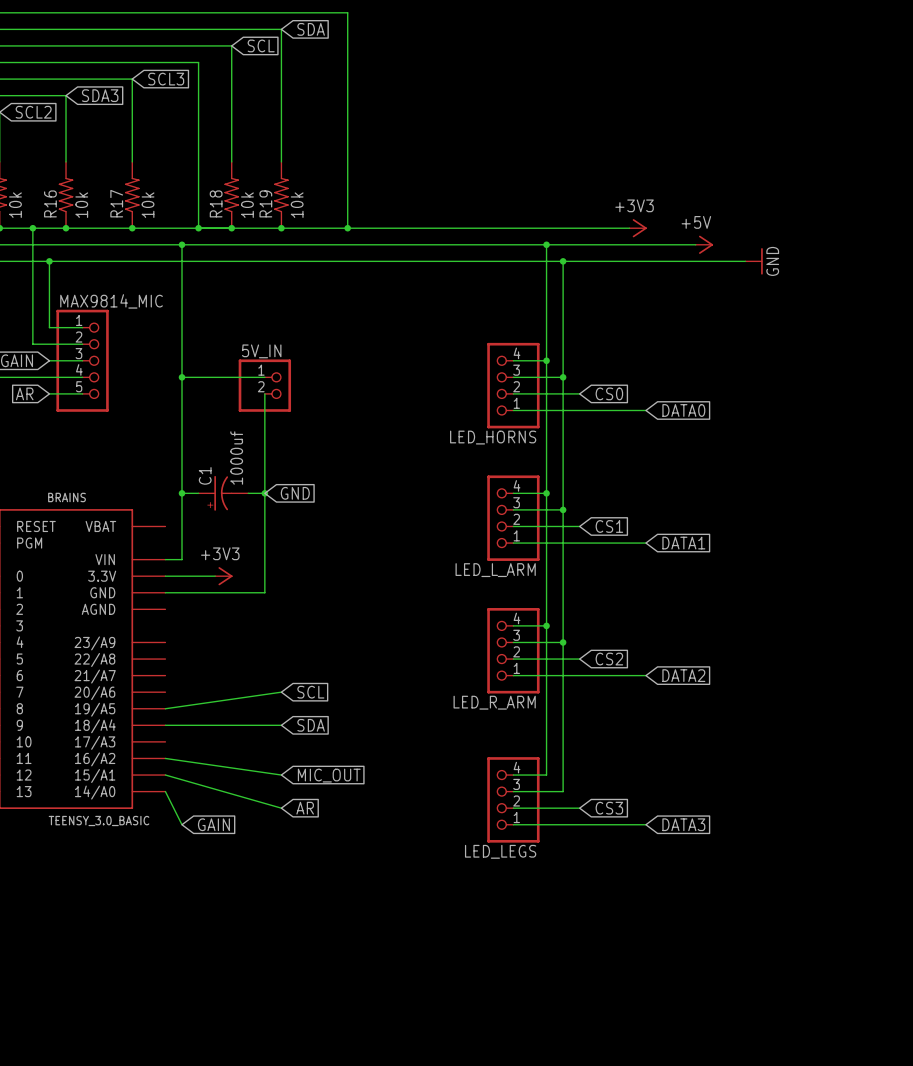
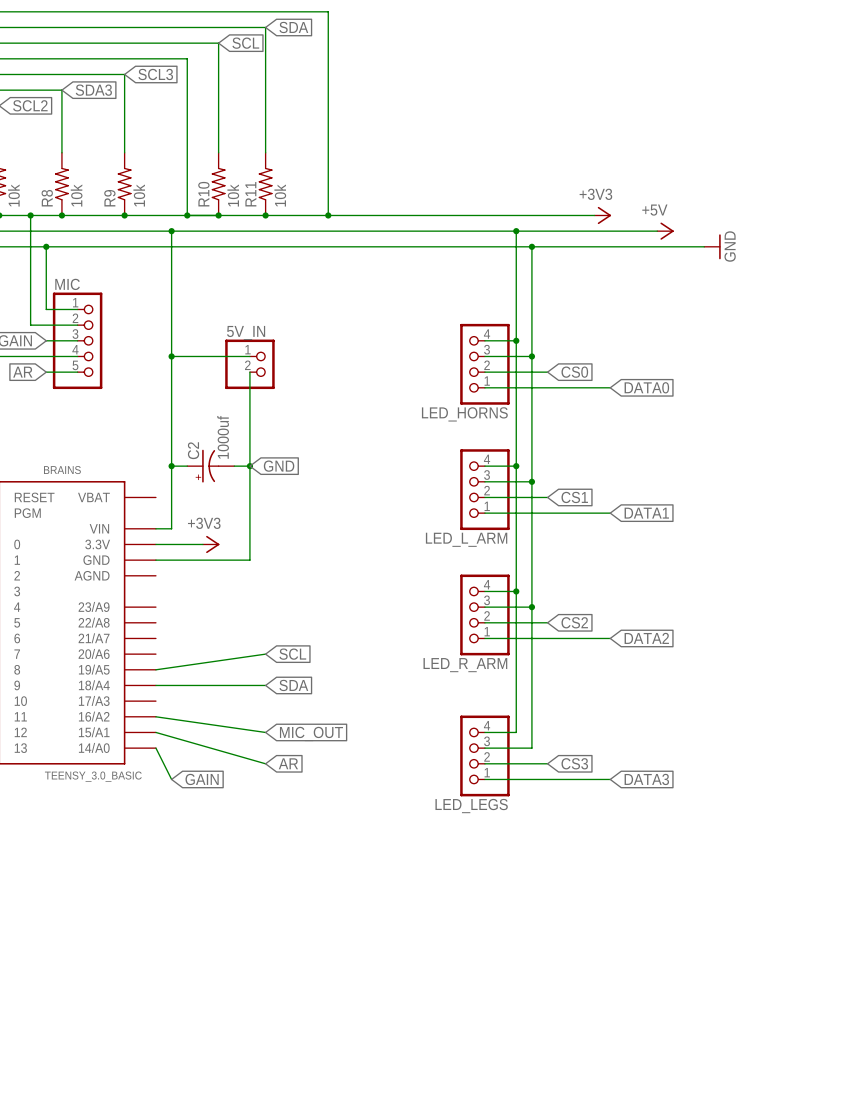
R16 name: R16 (50, 203) -> R8 (47, 198)
R17 name: R17 (116, 203) -> R9 (109, 198)
R18 name: R18 (216, 203) -> R10 (203, 194)
R19 name: R19 (265, 203) -> R11 (250, 194)
MAX9814_MIC name: MAX9814_MIC (111, 301) -> MIC (67, 284)
C1 name: C1 (205, 475) -> C2 (193, 450)

